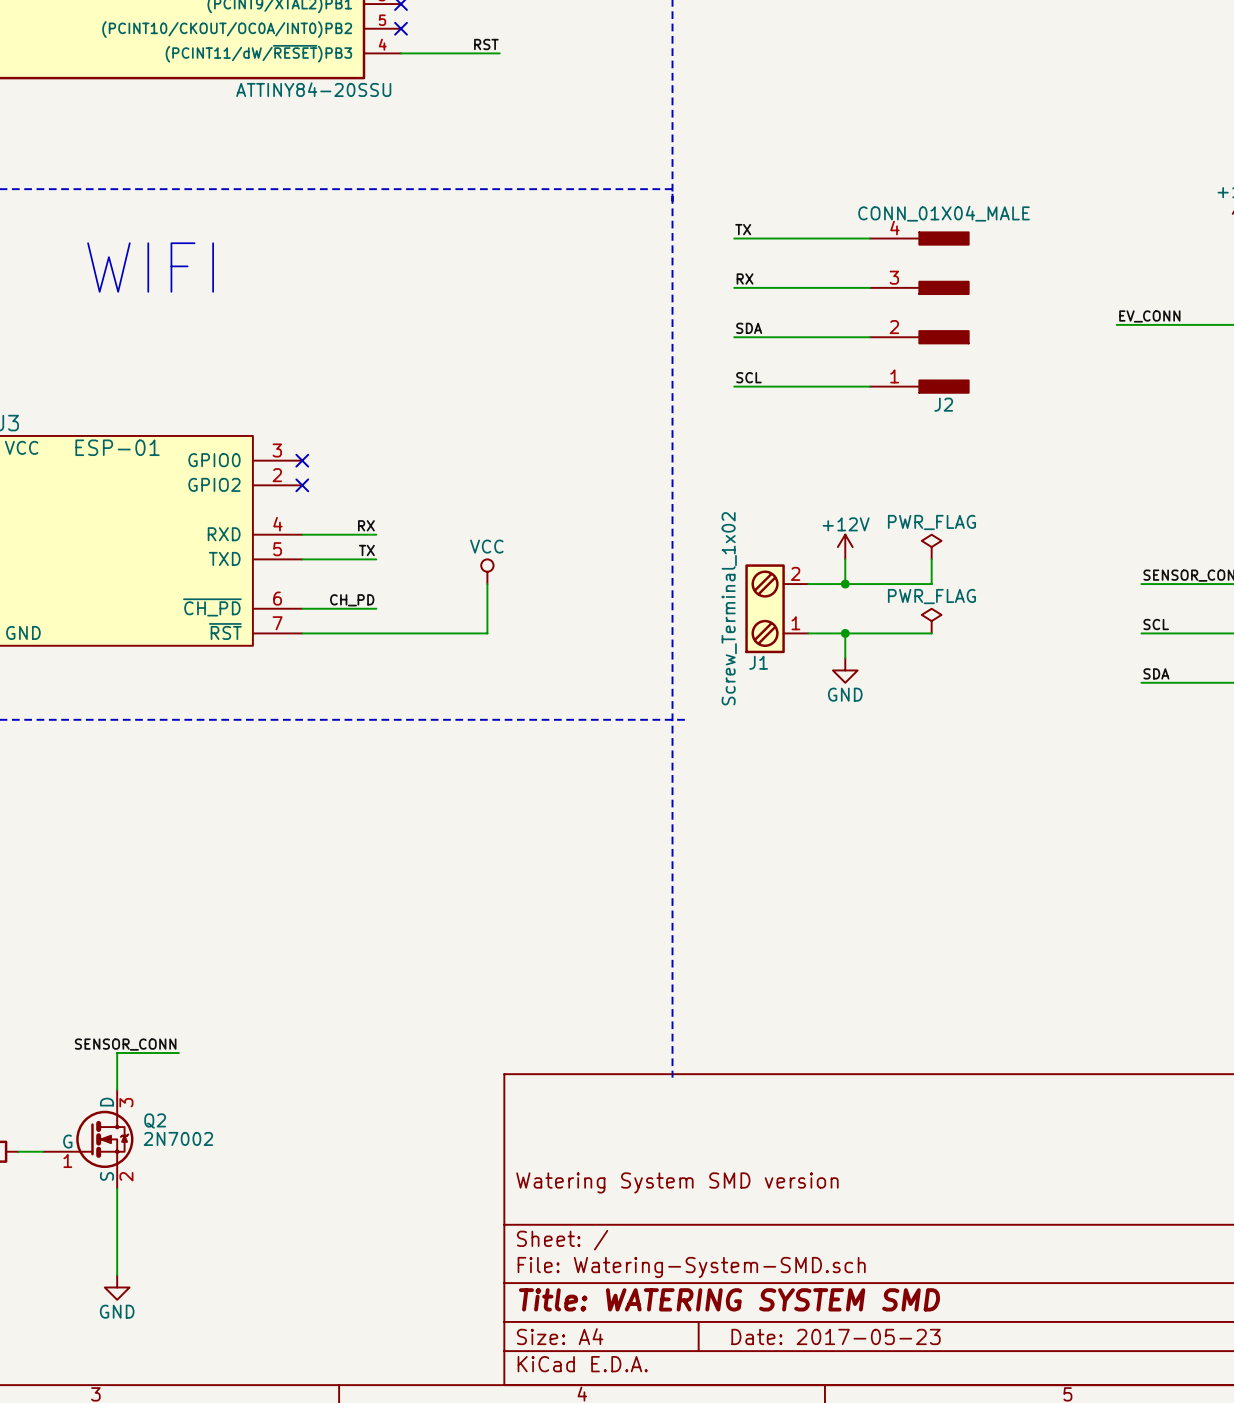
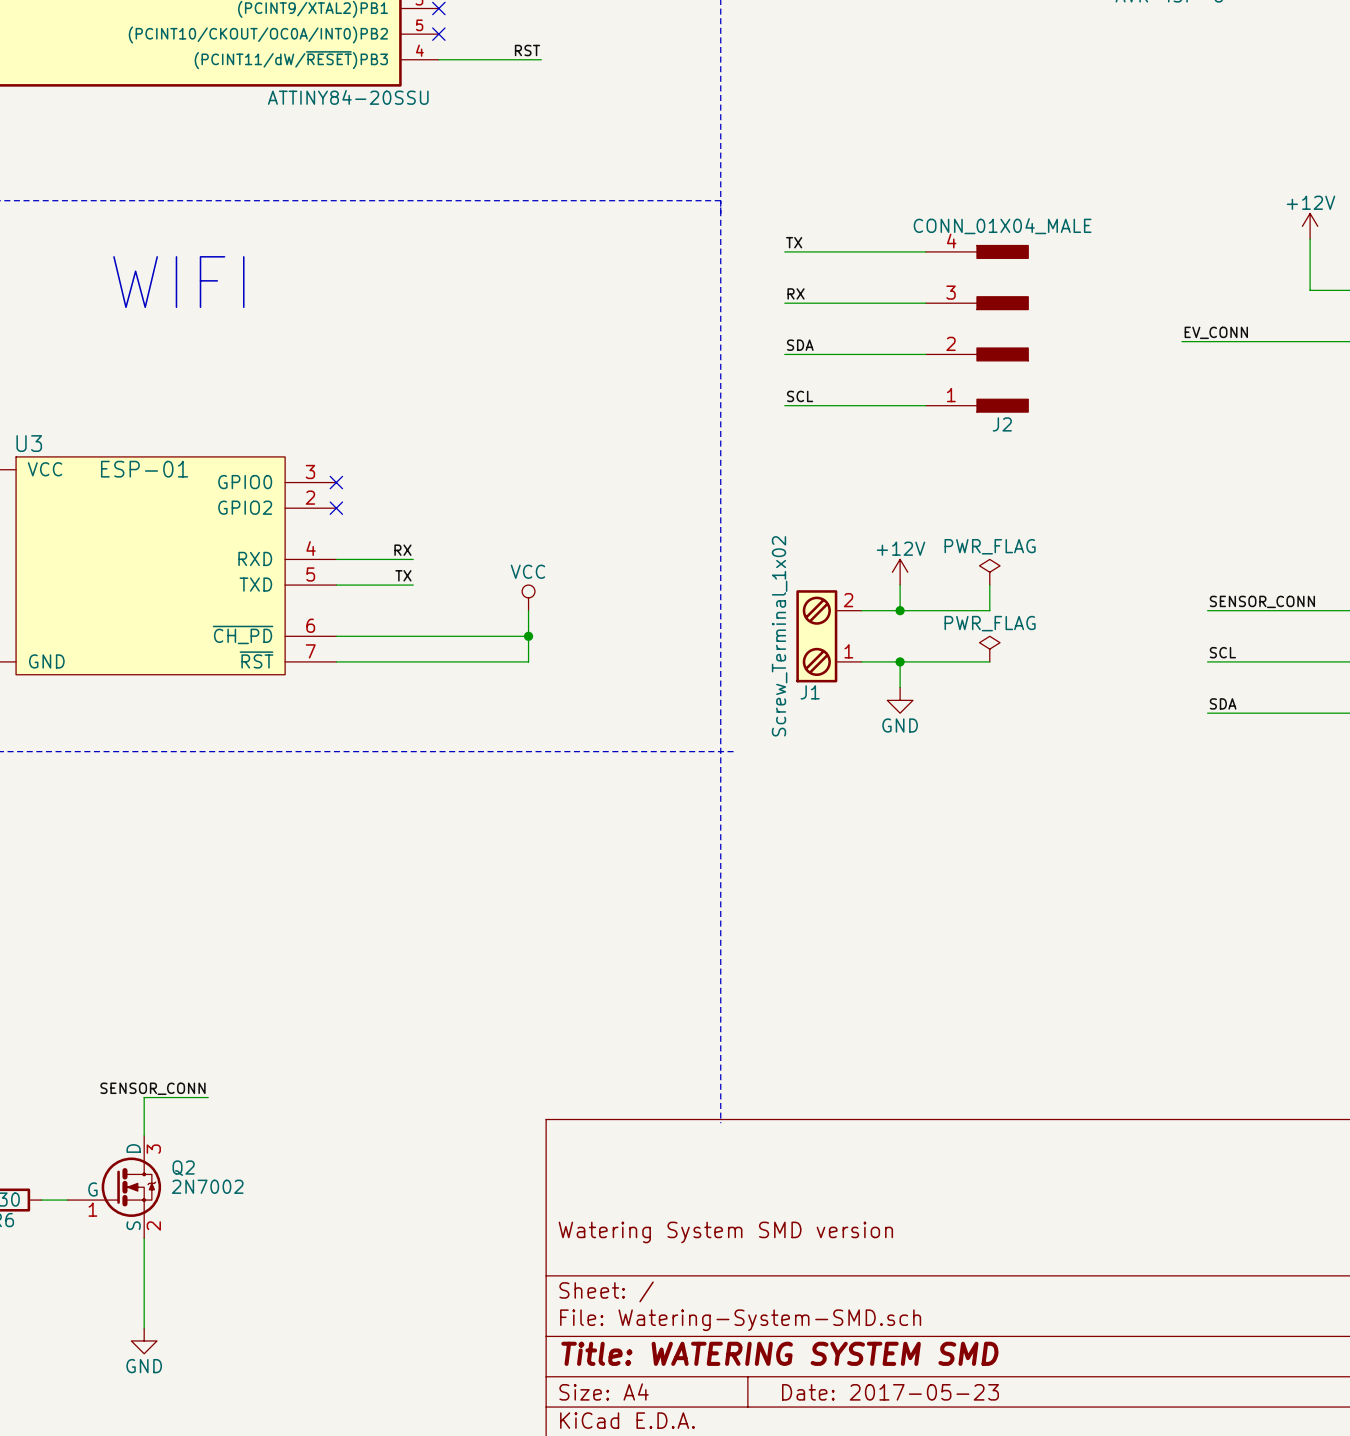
label: CH_PD (352, 600) -> none
wire: none -> (413, 636) (528, 636)
junction: none -> (528, 636)

